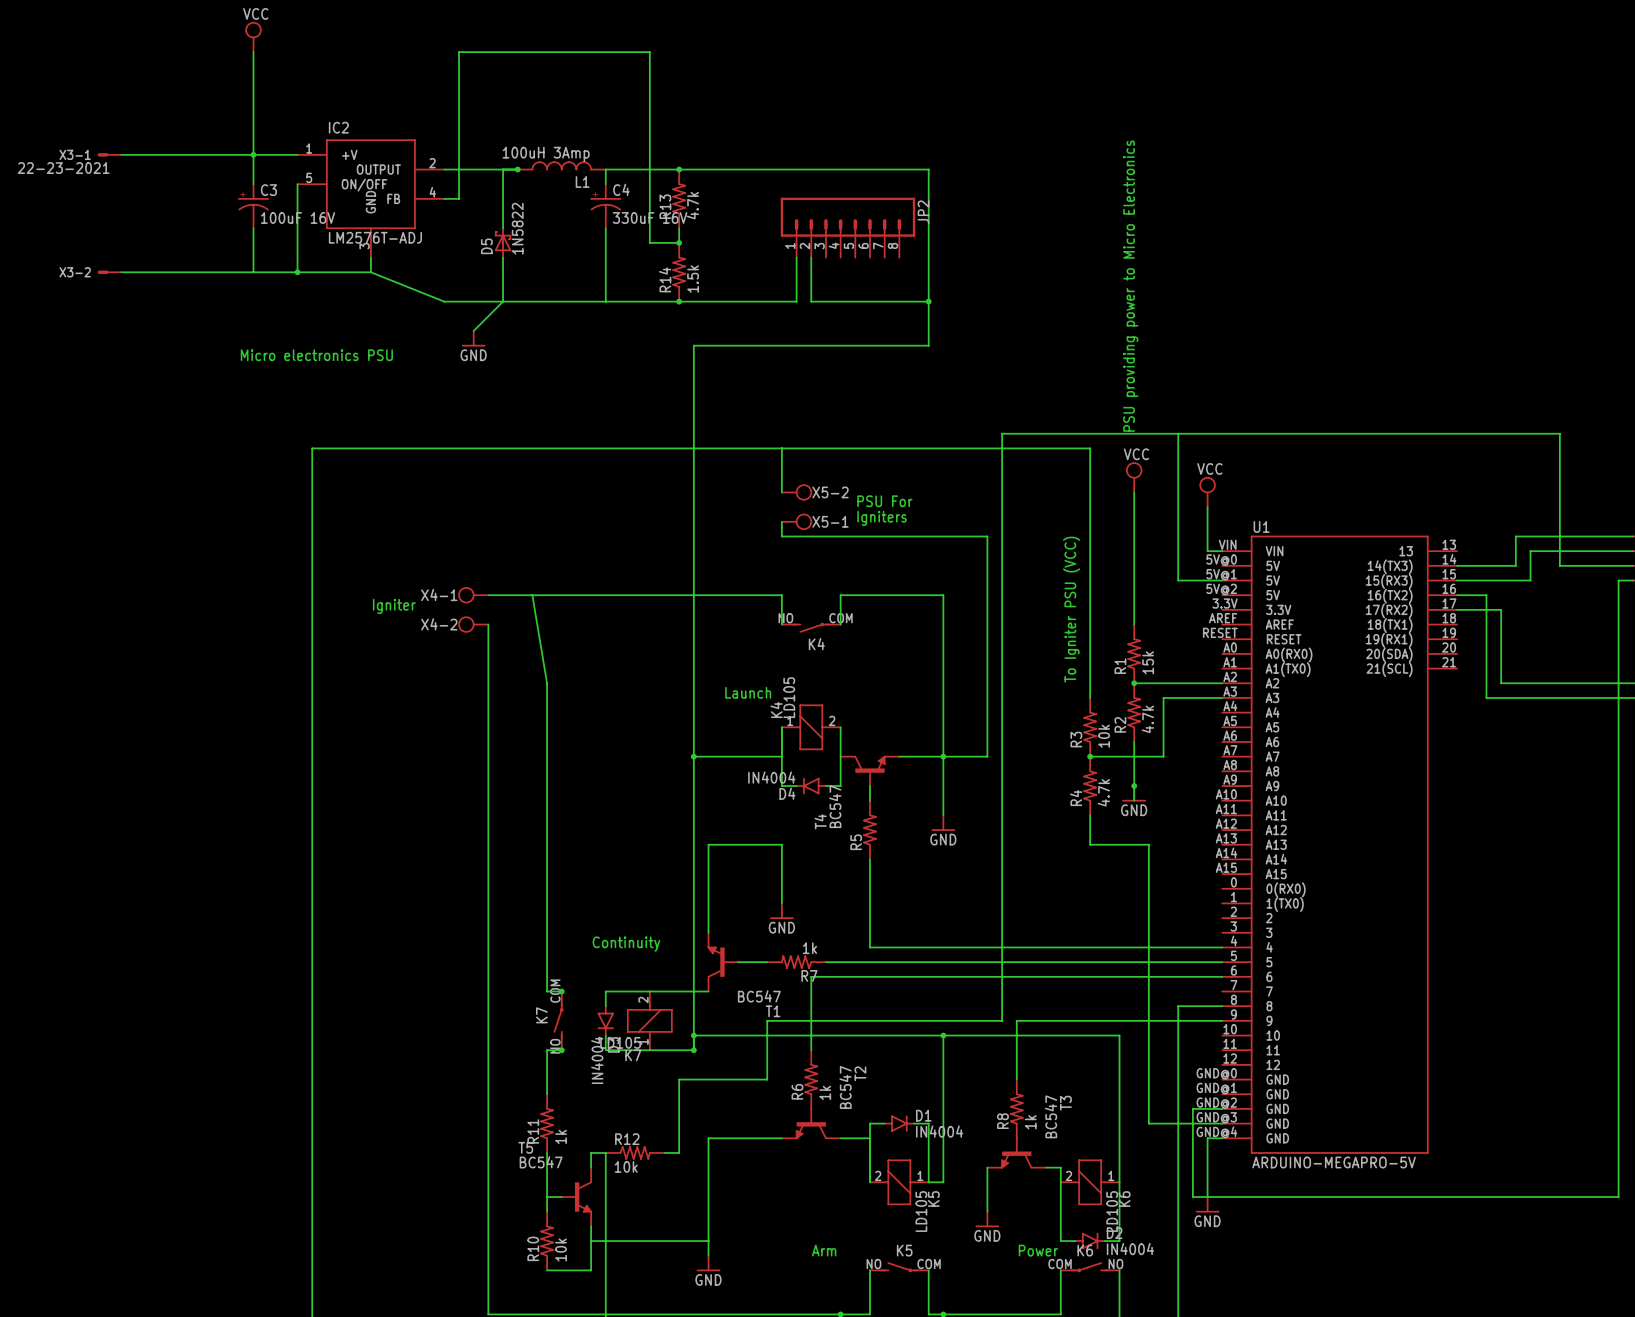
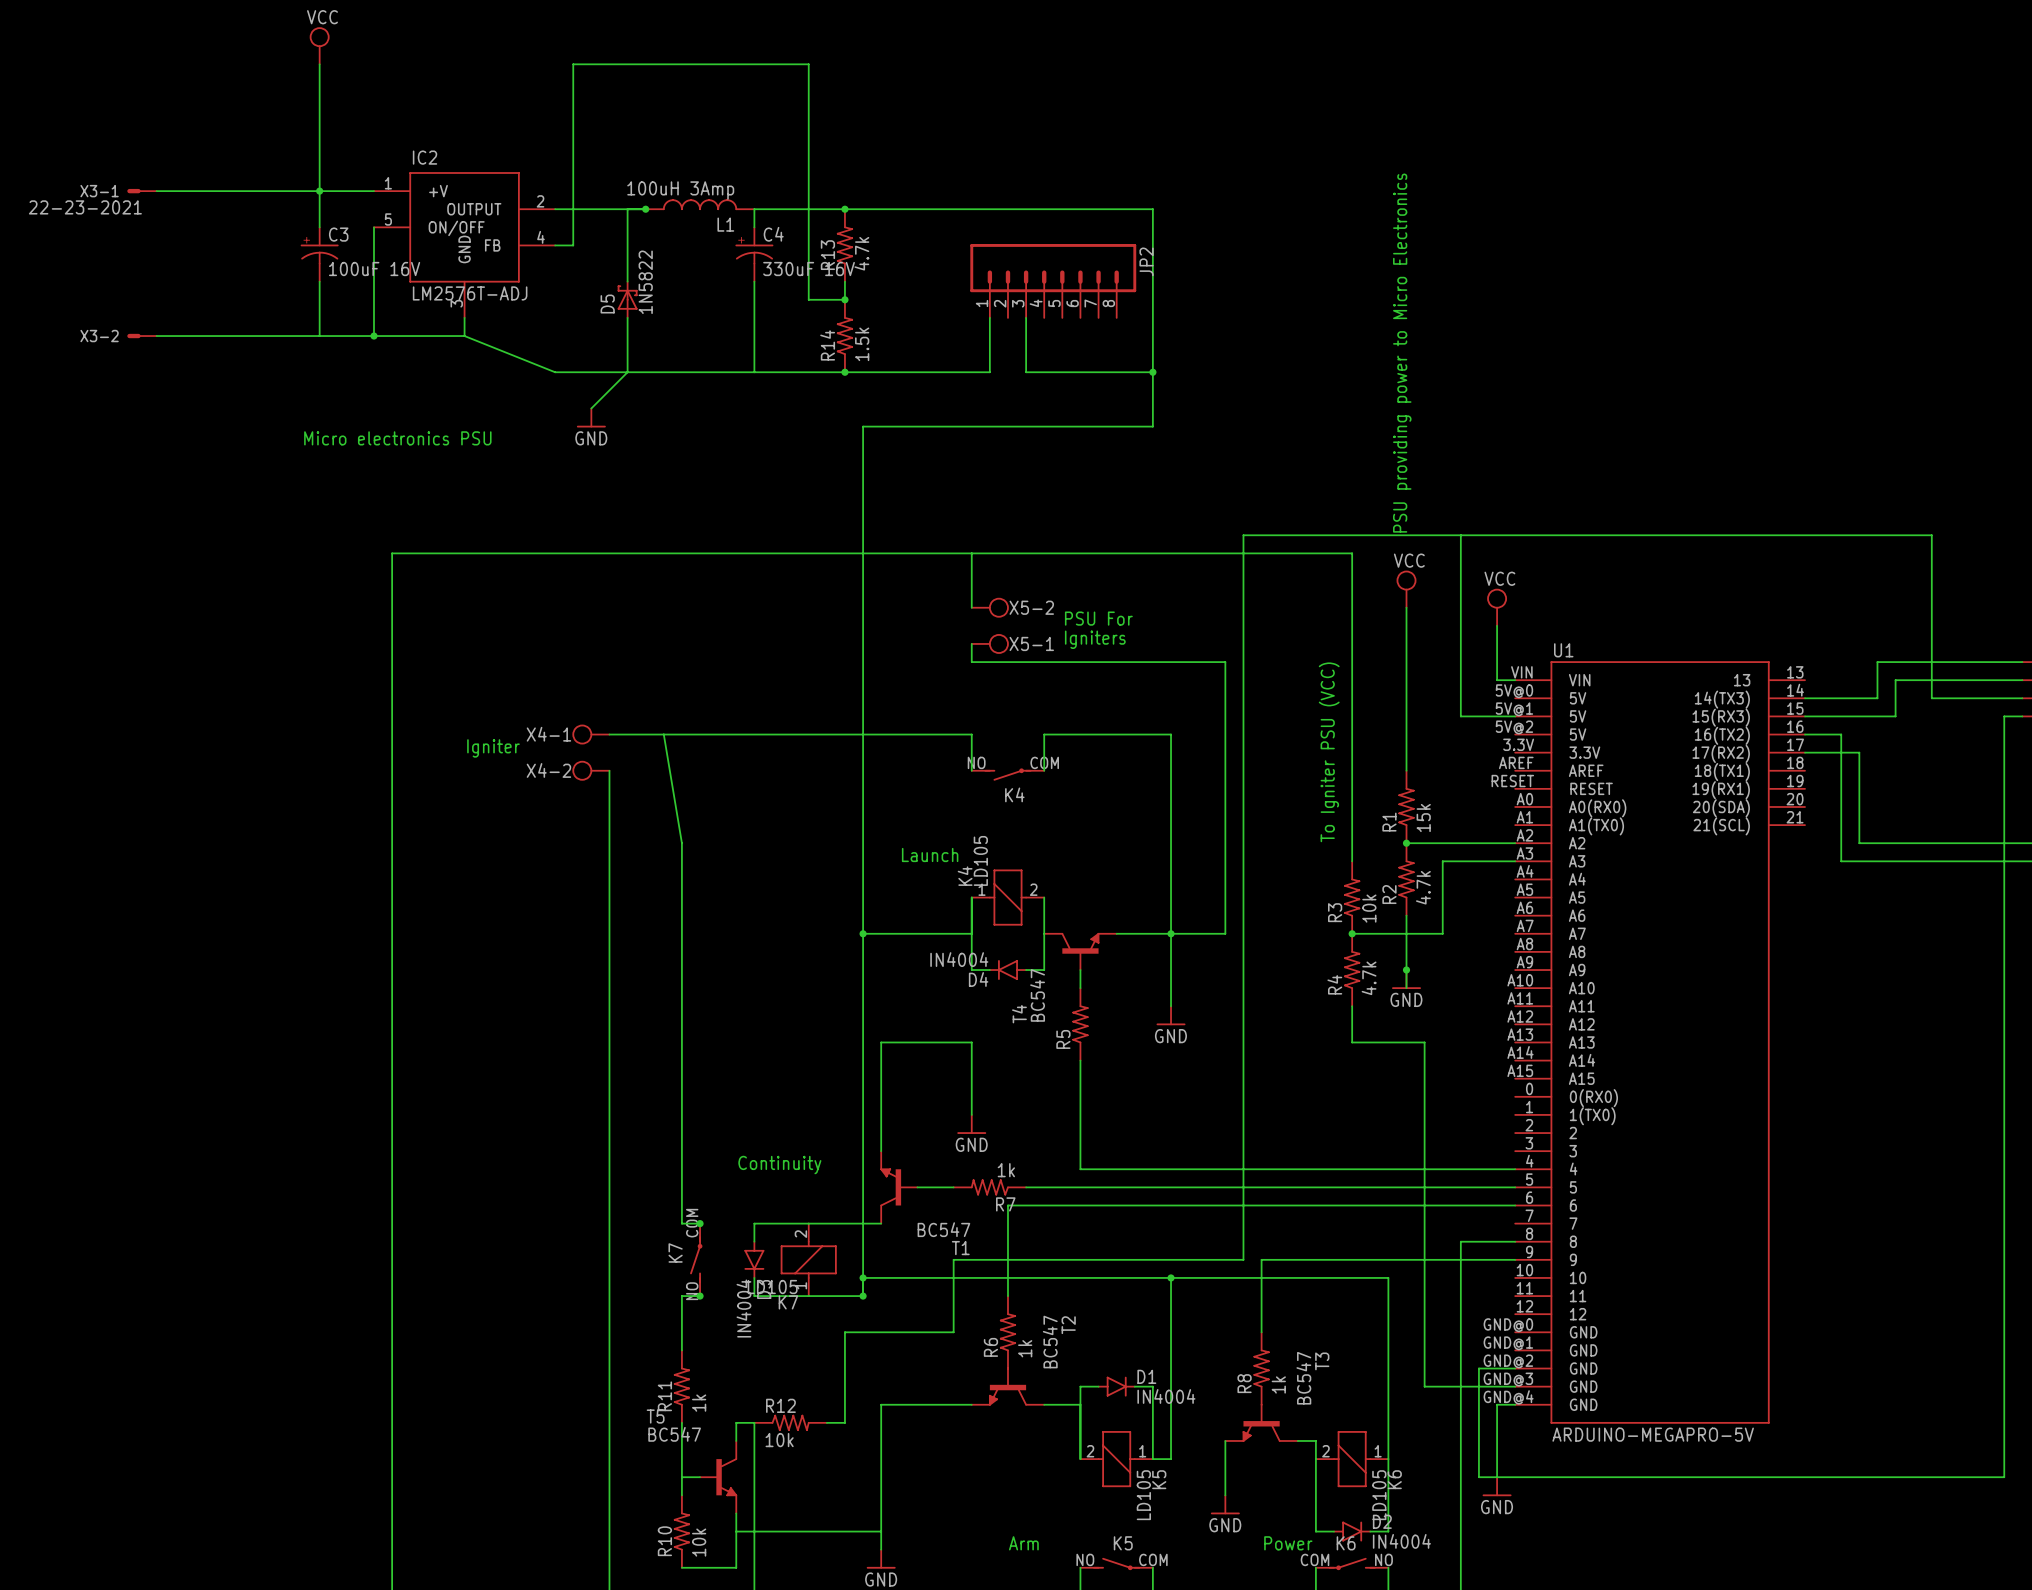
wire: (811, 257) (811, 301) (825, 301) -> (1026, 317) (1026, 372)

